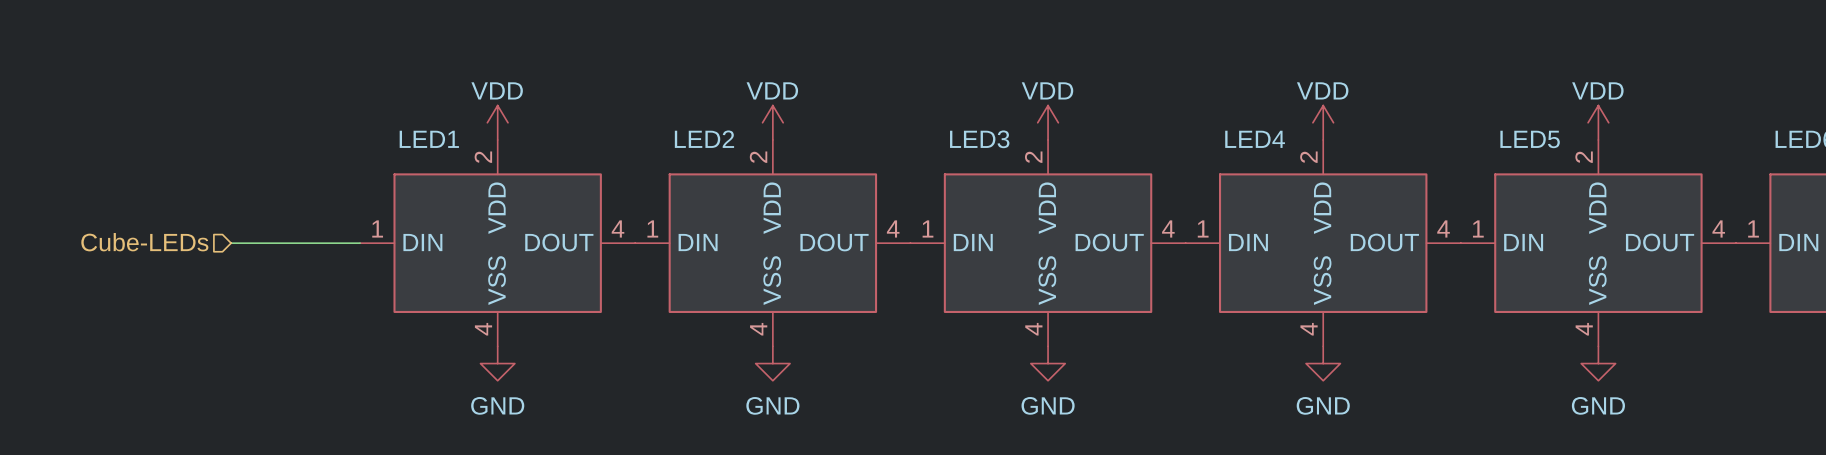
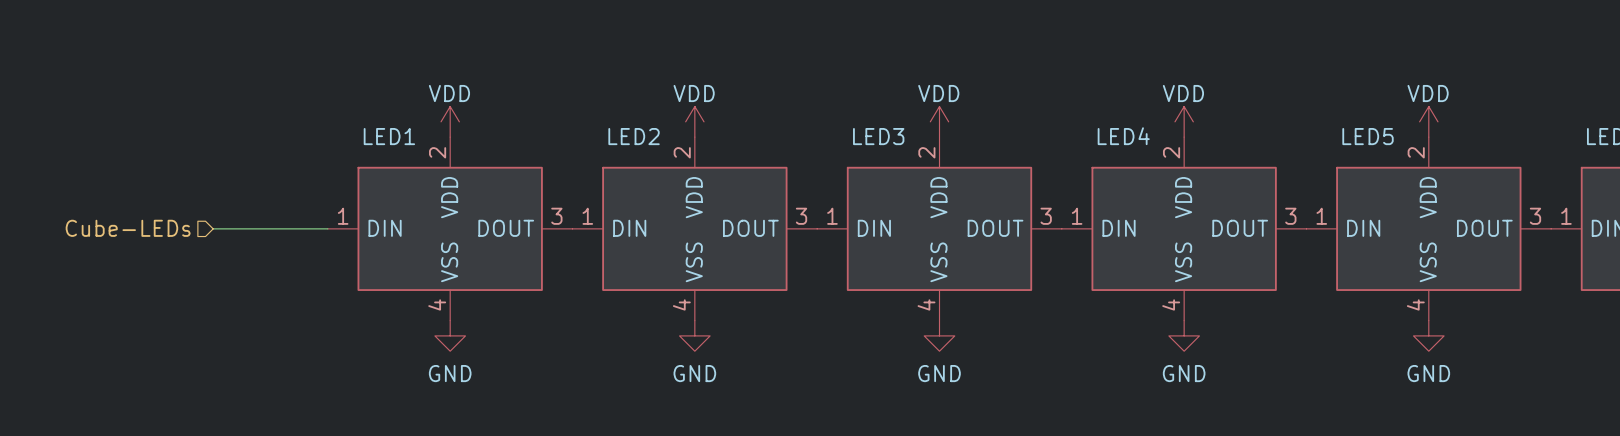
LED1 pin number: 4 (617, 228) -> 3 (556, 216)
LED2 pin number: 4 (893, 228) -> 3 (801, 216)
LED3 pin number: 4 (1168, 228) -> 3 (1046, 216)
LED4 pin number: 4 (1443, 228) -> 3 (1290, 216)
LED5 pin number: 4 (1718, 228) -> 3 (1535, 216)

